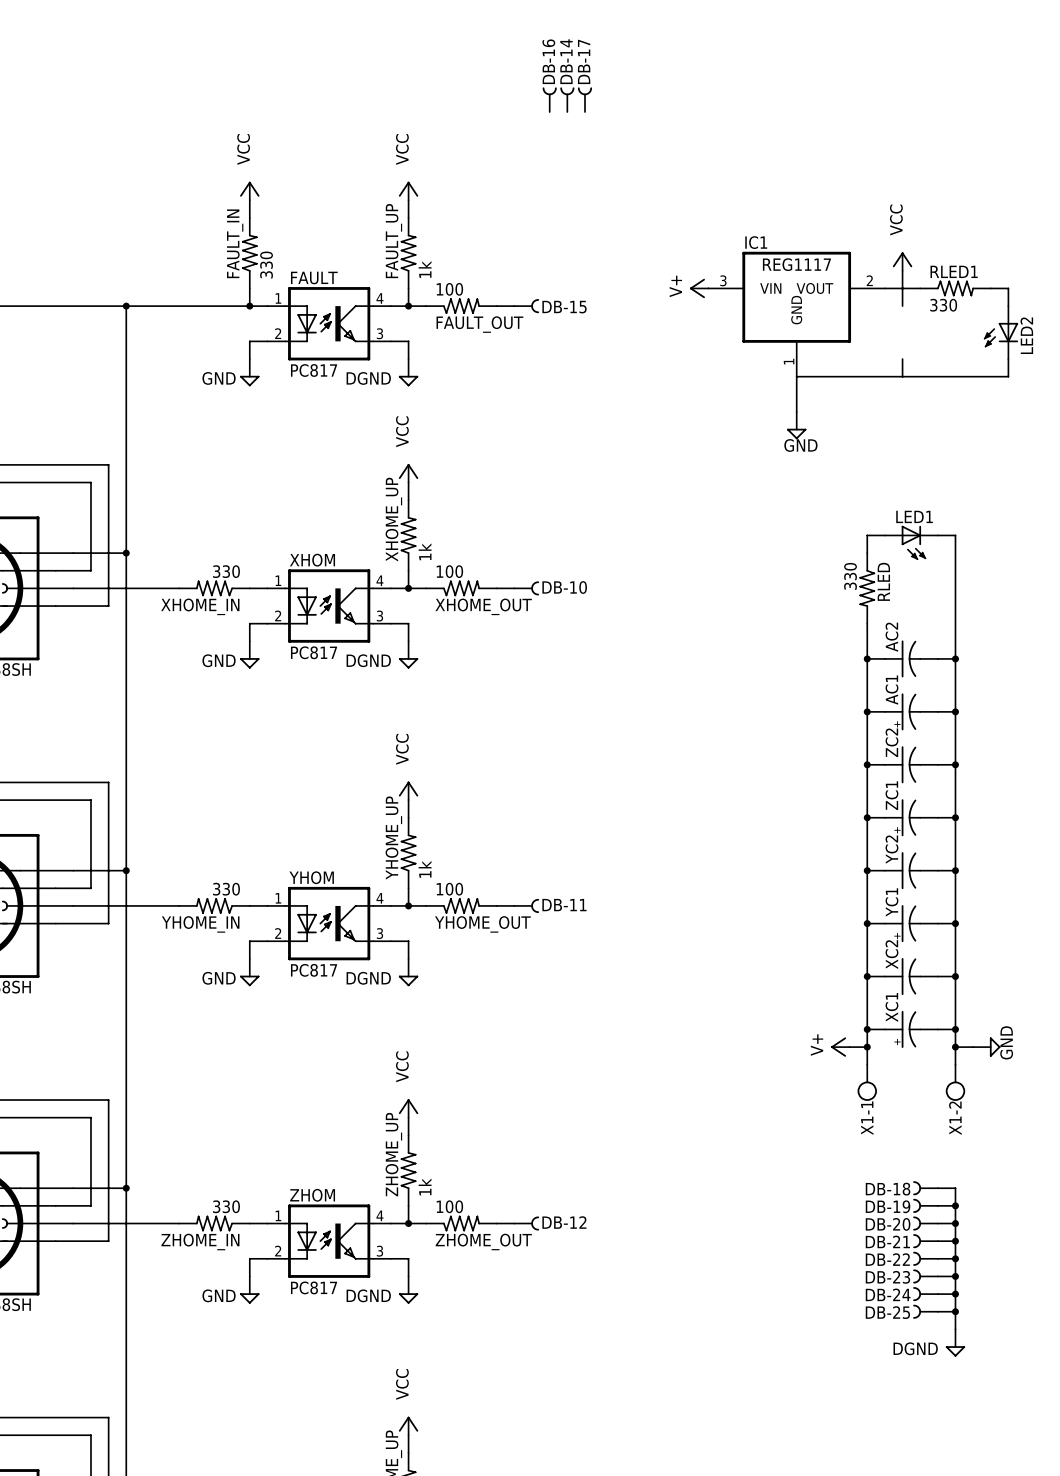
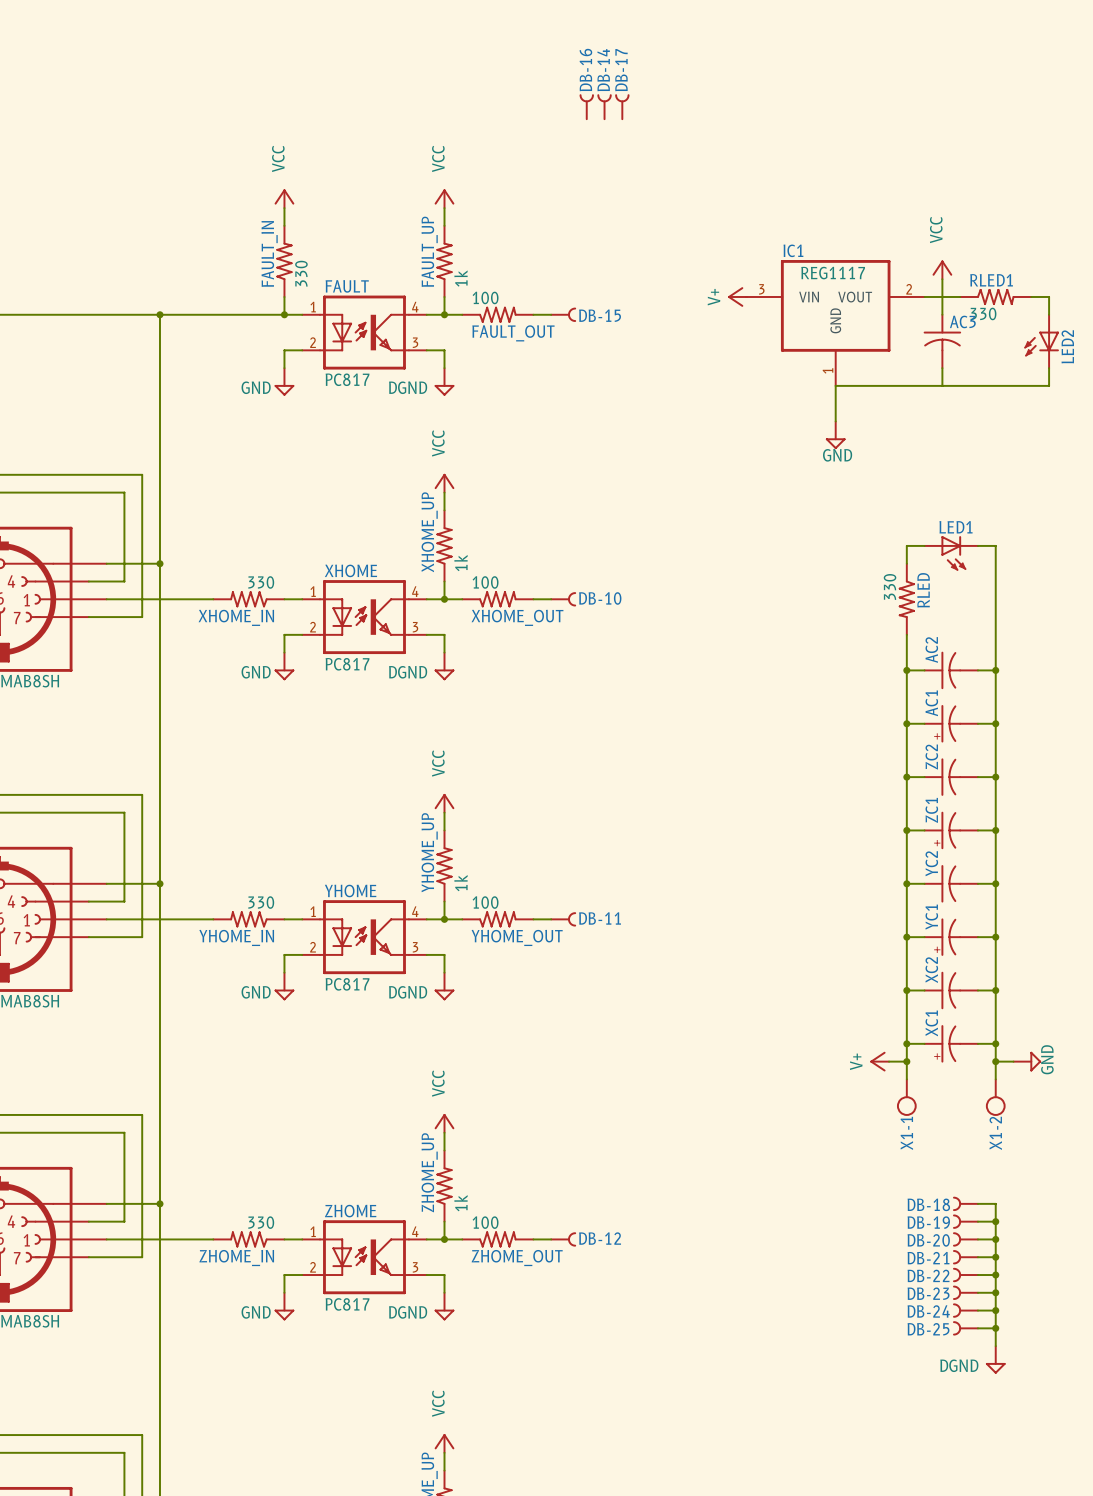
AC3: none -> (942, 341)
XHOM name: XHOM (312, 560) -> XHOME (350, 570)
YHOM name: YHOM (311, 877) -> YHOME (350, 890)
ZHOM name: ZHOM (312, 1195) -> ZHOME (350, 1211)

